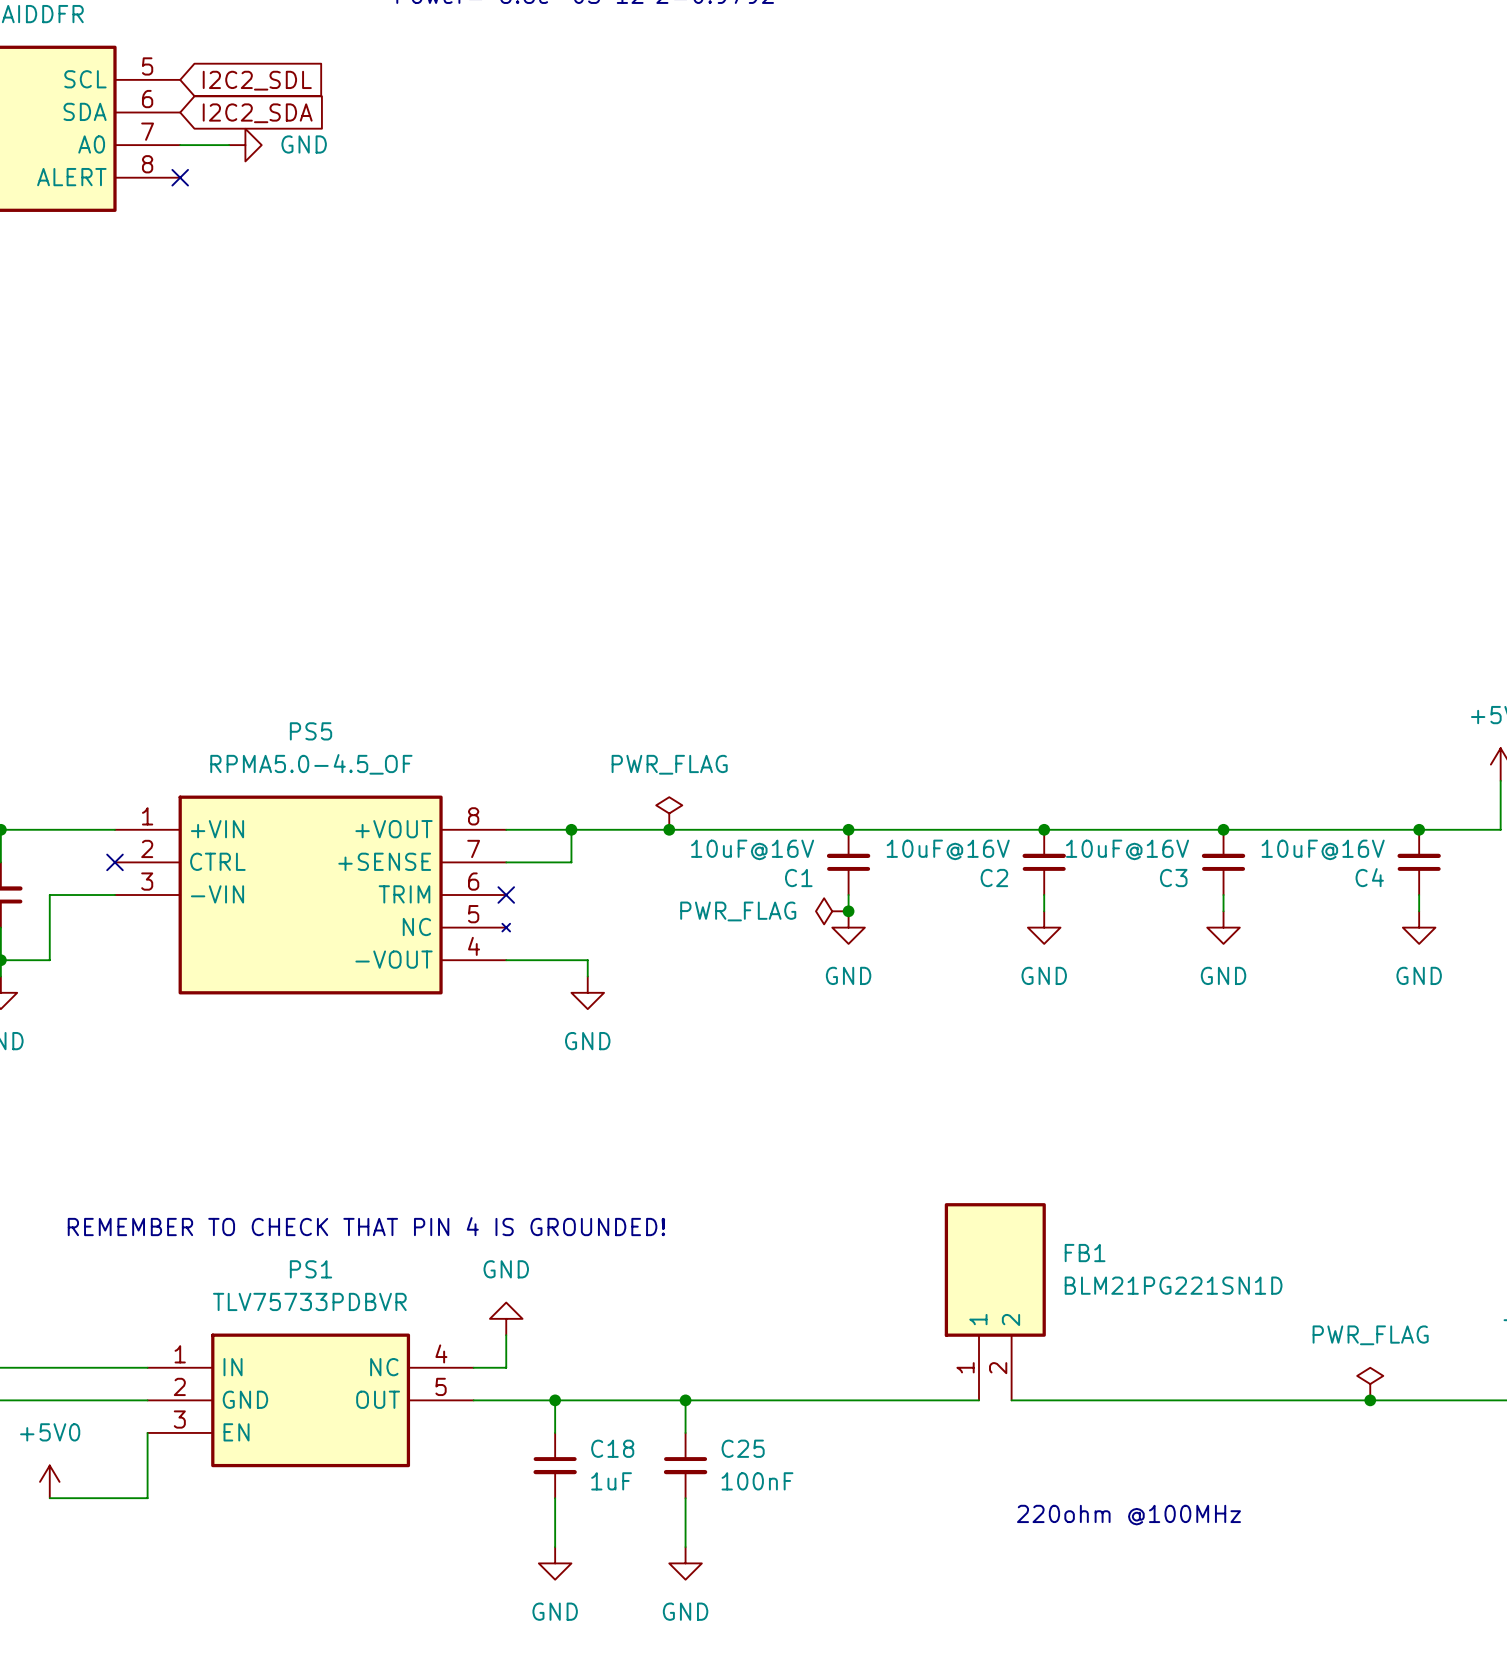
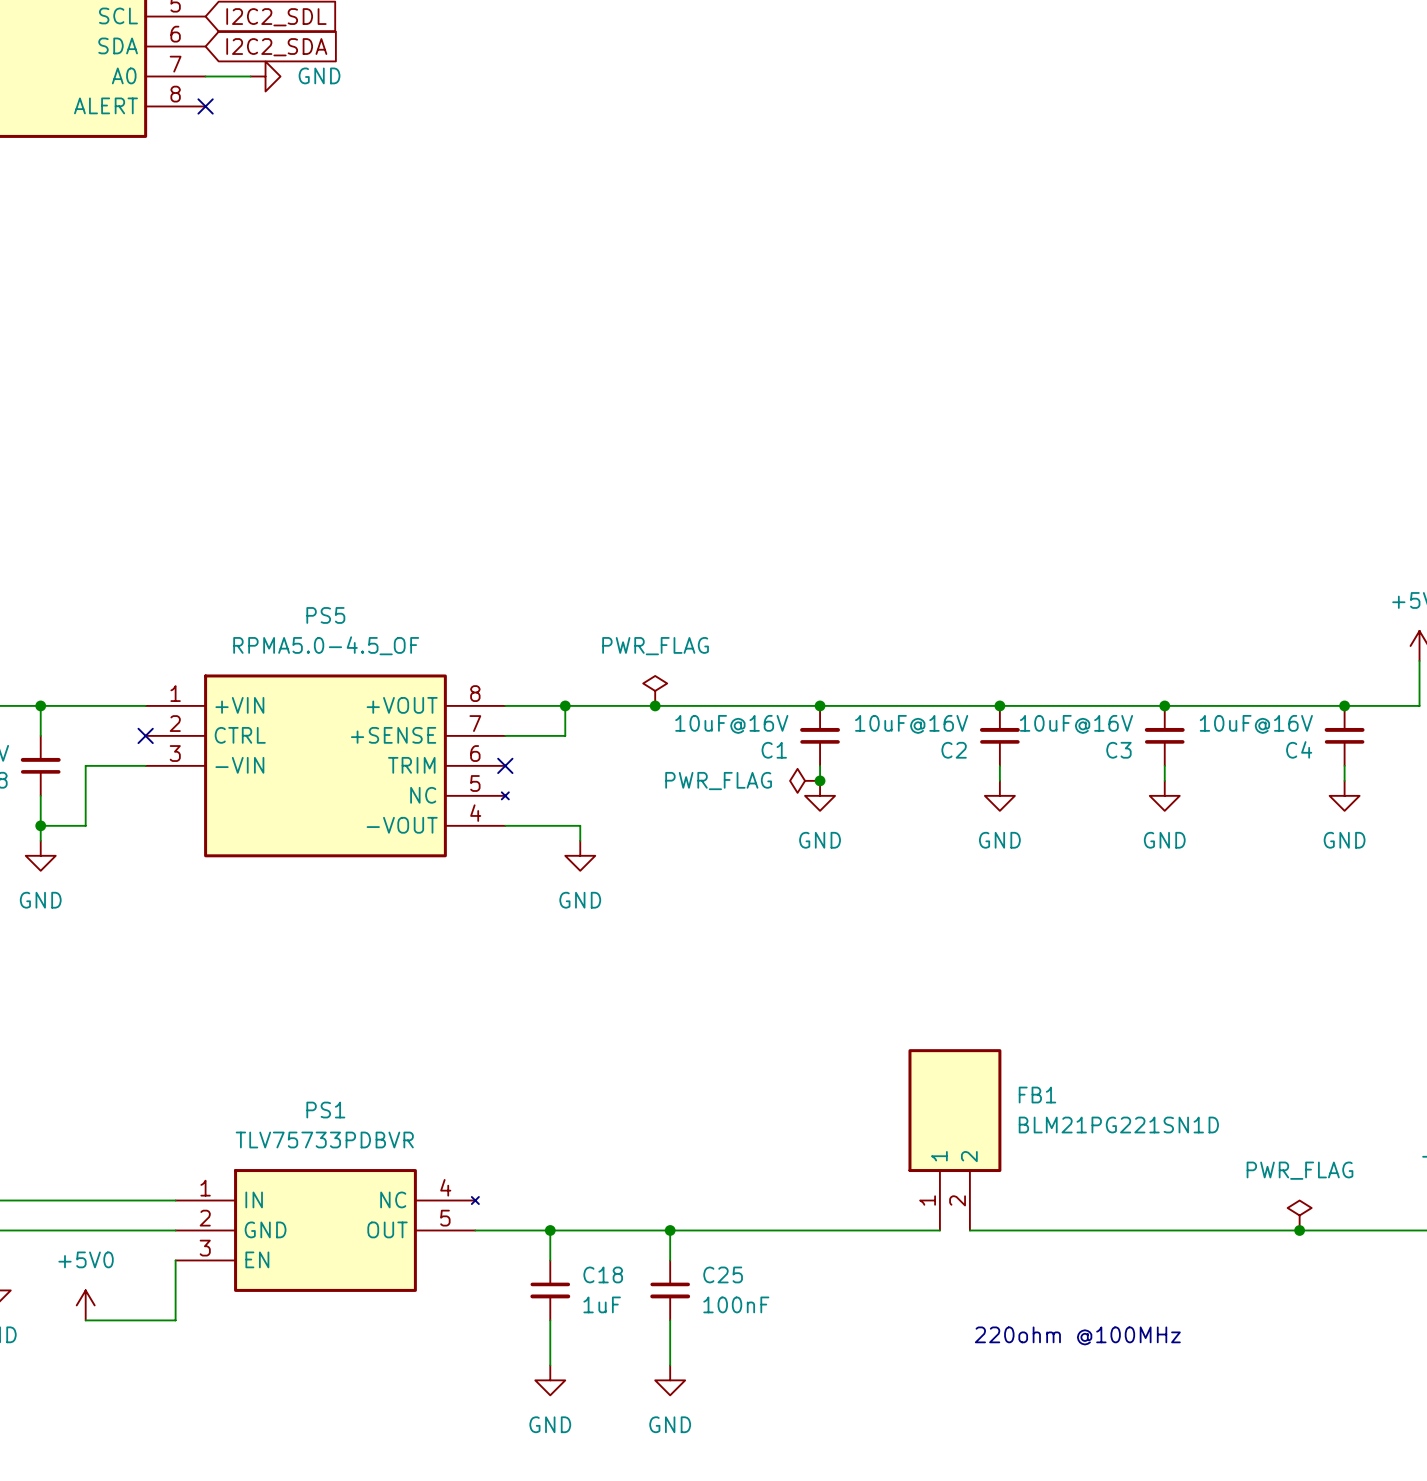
text: REMEMBER TO CHECK THAT PIN 4 IS GROUNDED! (366, 1226) -> none
power symbol: GND (506, 1318) -> none
PS1 symbol: [147, 1333, 474, 1468] -> [175, 1169, 479, 1292]
wire: (506, 1335) (506, 1367) (473, 1367) -> none

